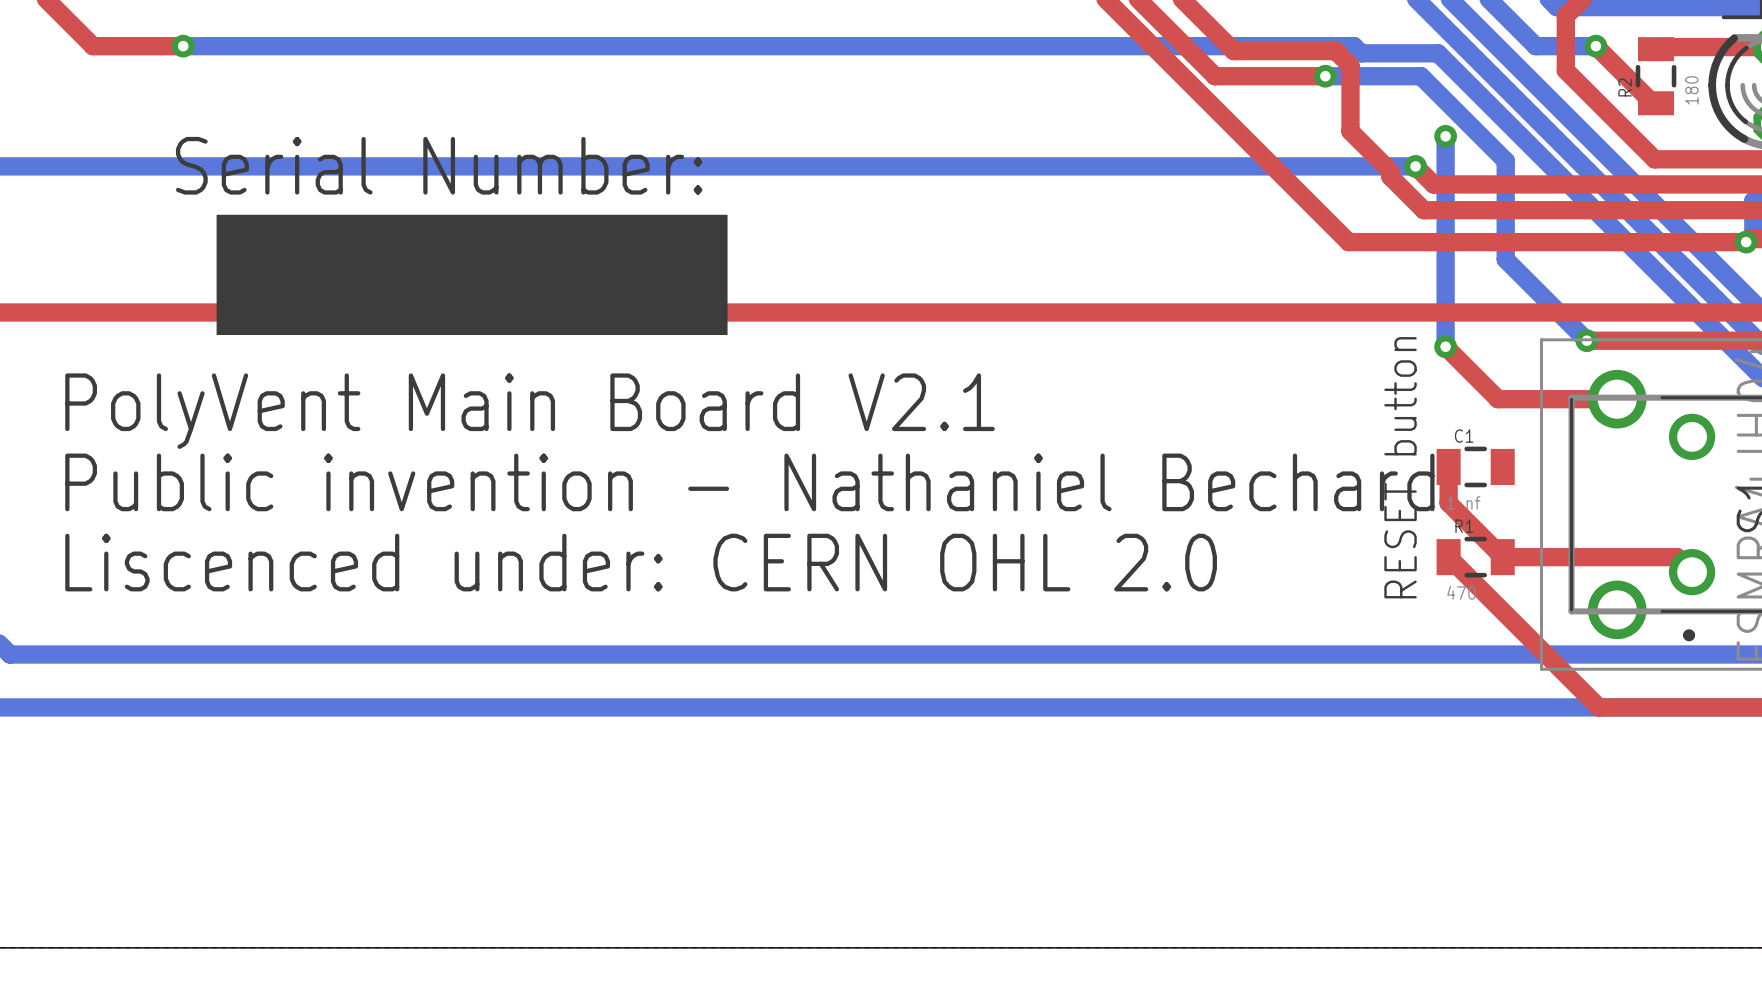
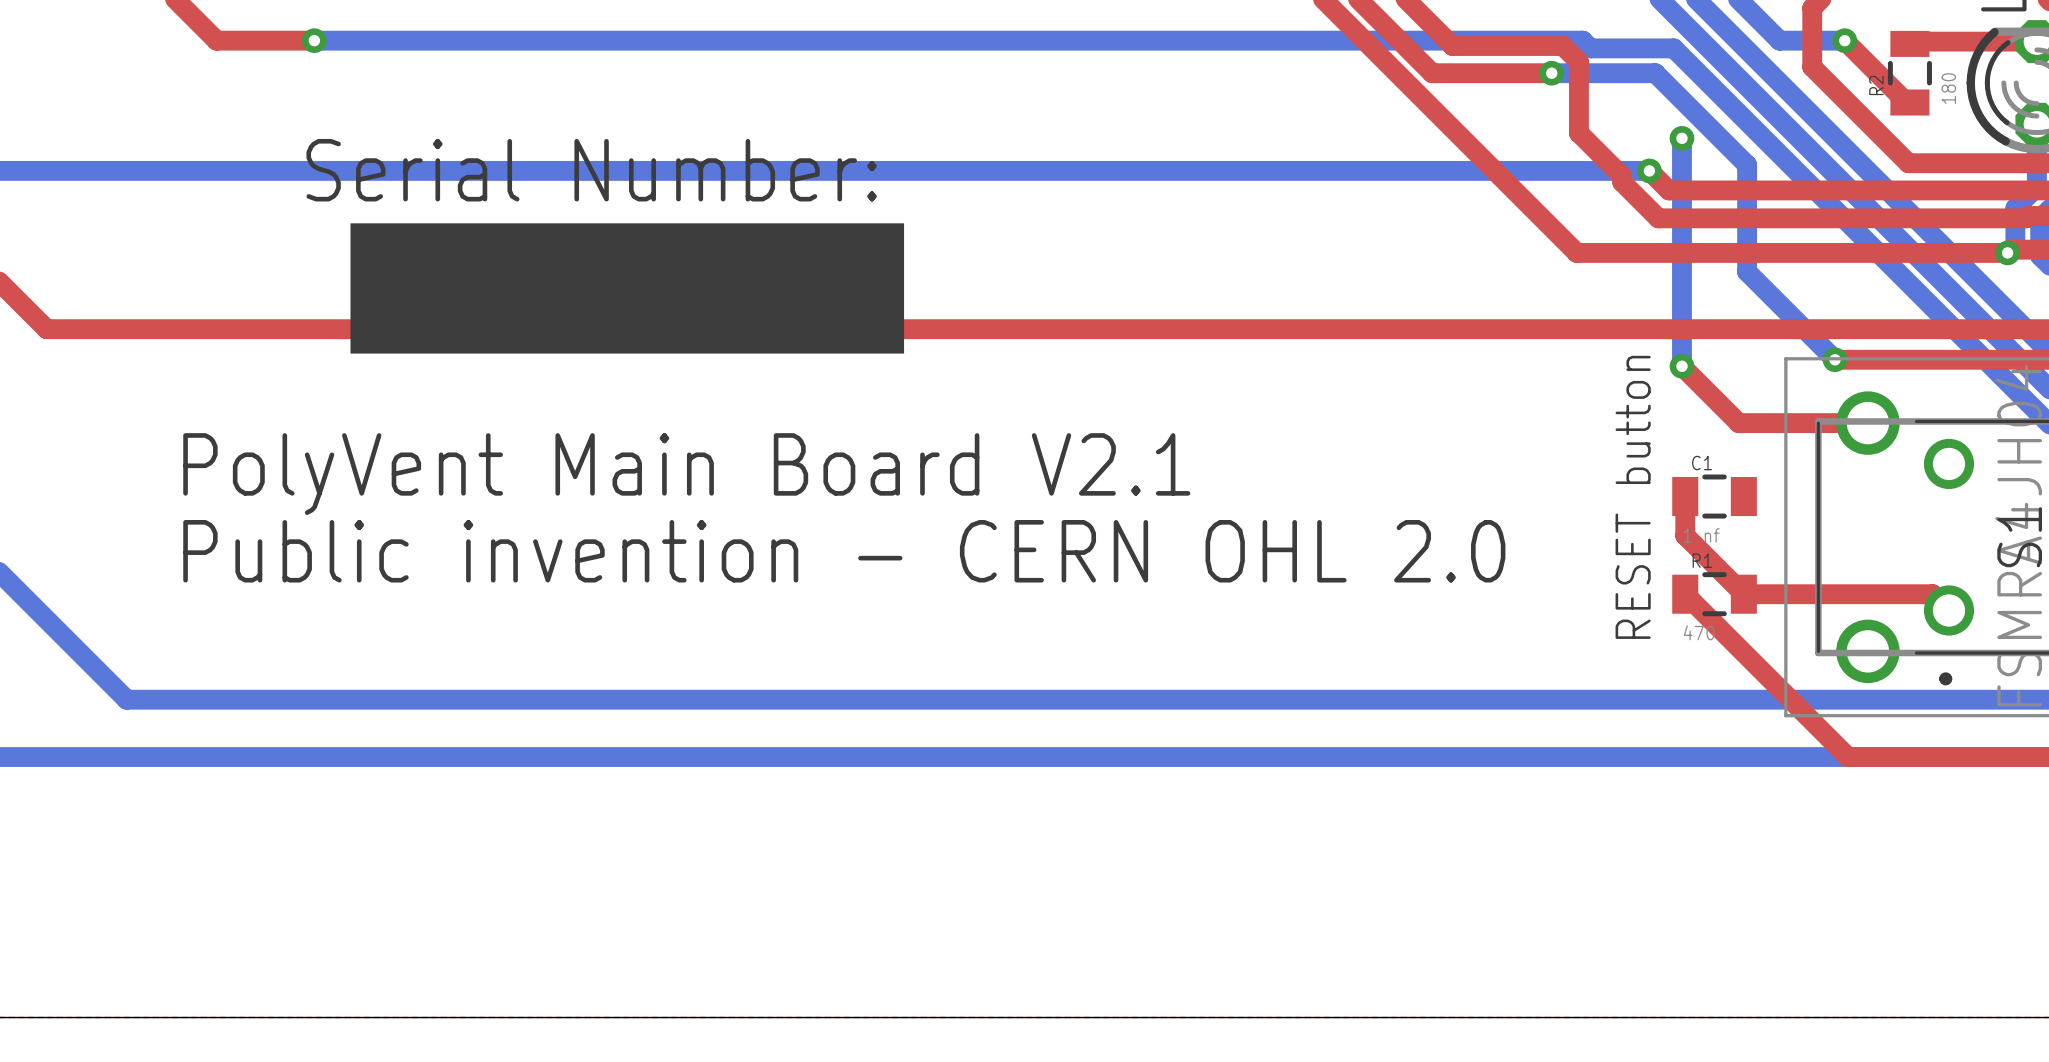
text position: PolyVent Main Board V2.1 (530, 411) -> PolyVent Main Board V2.1 (686, 474)
text: Public invention - Nathaniel Bechard (749, 482) -> Public invention - CERN OHL 2.0 (844, 551)
text: Liscenced under: CERN OHL 2.0 (641, 562) -> none

